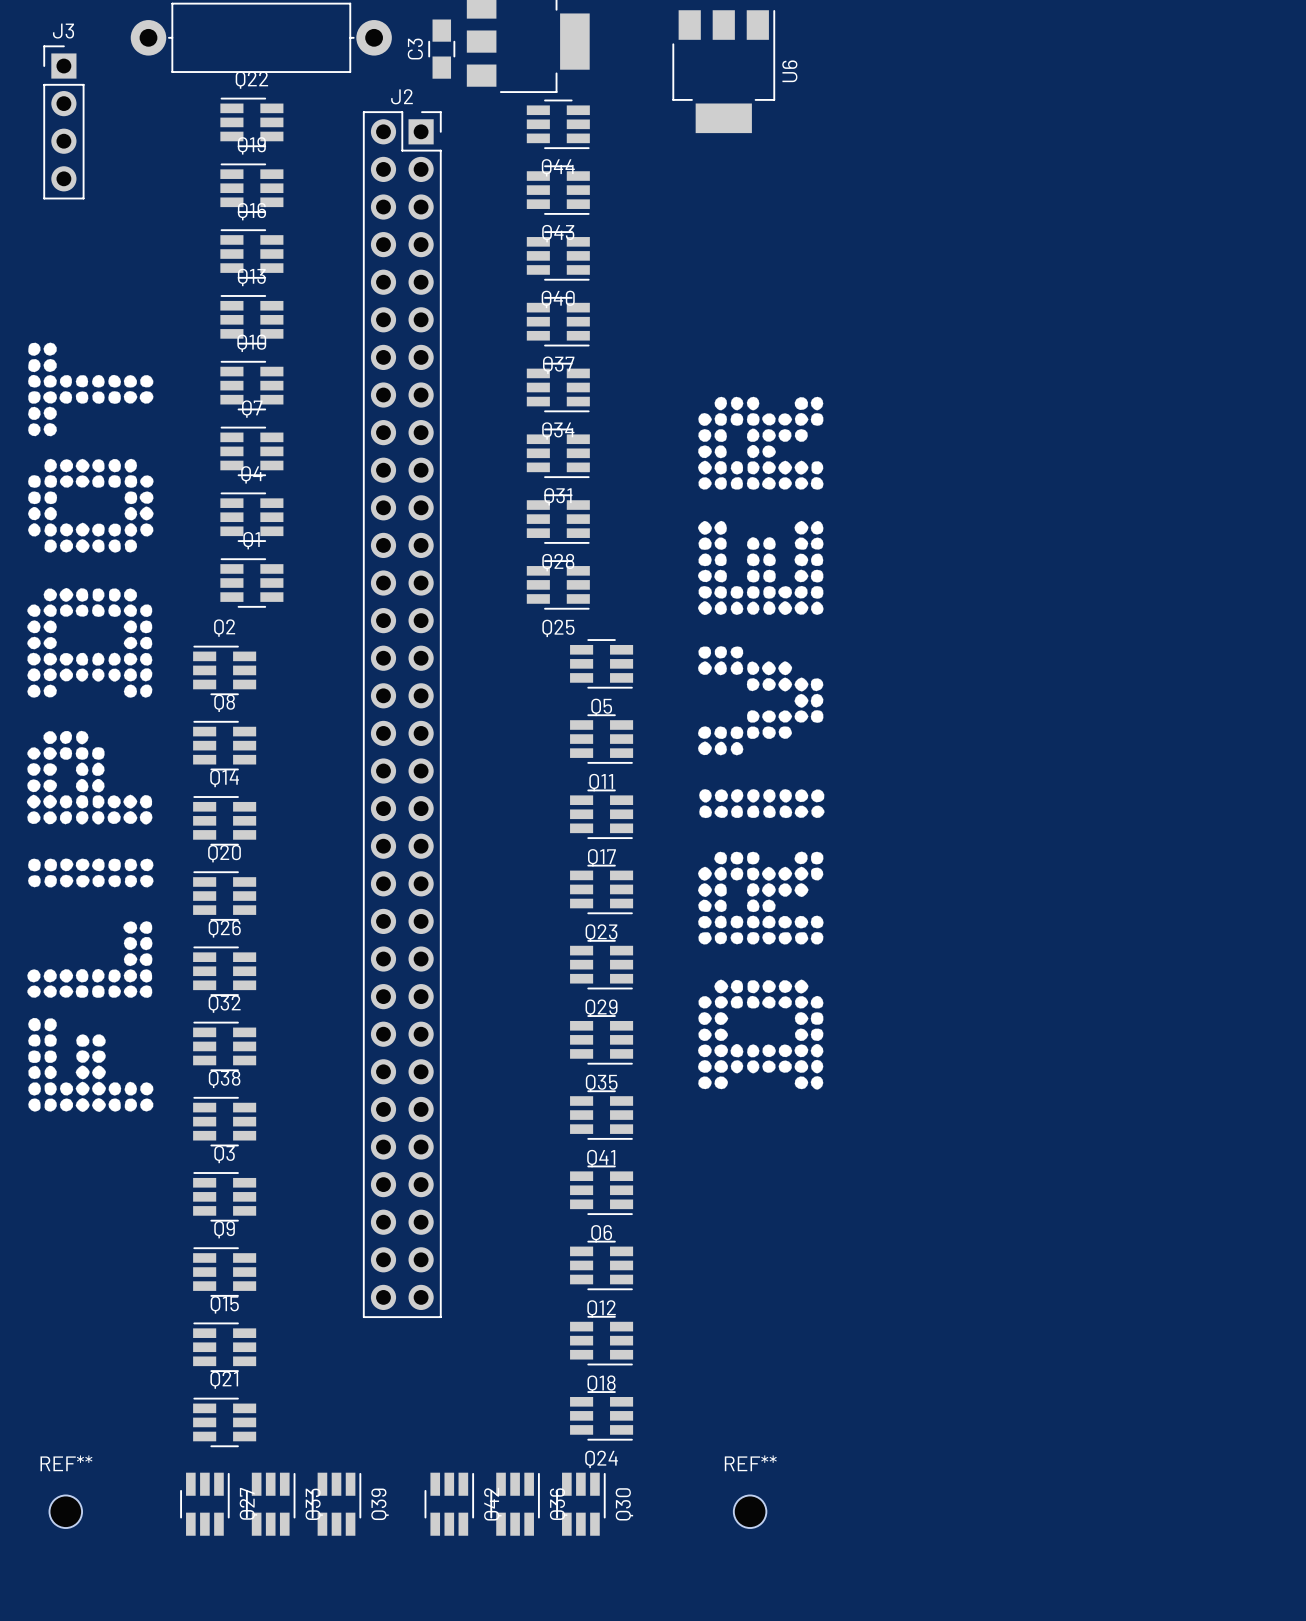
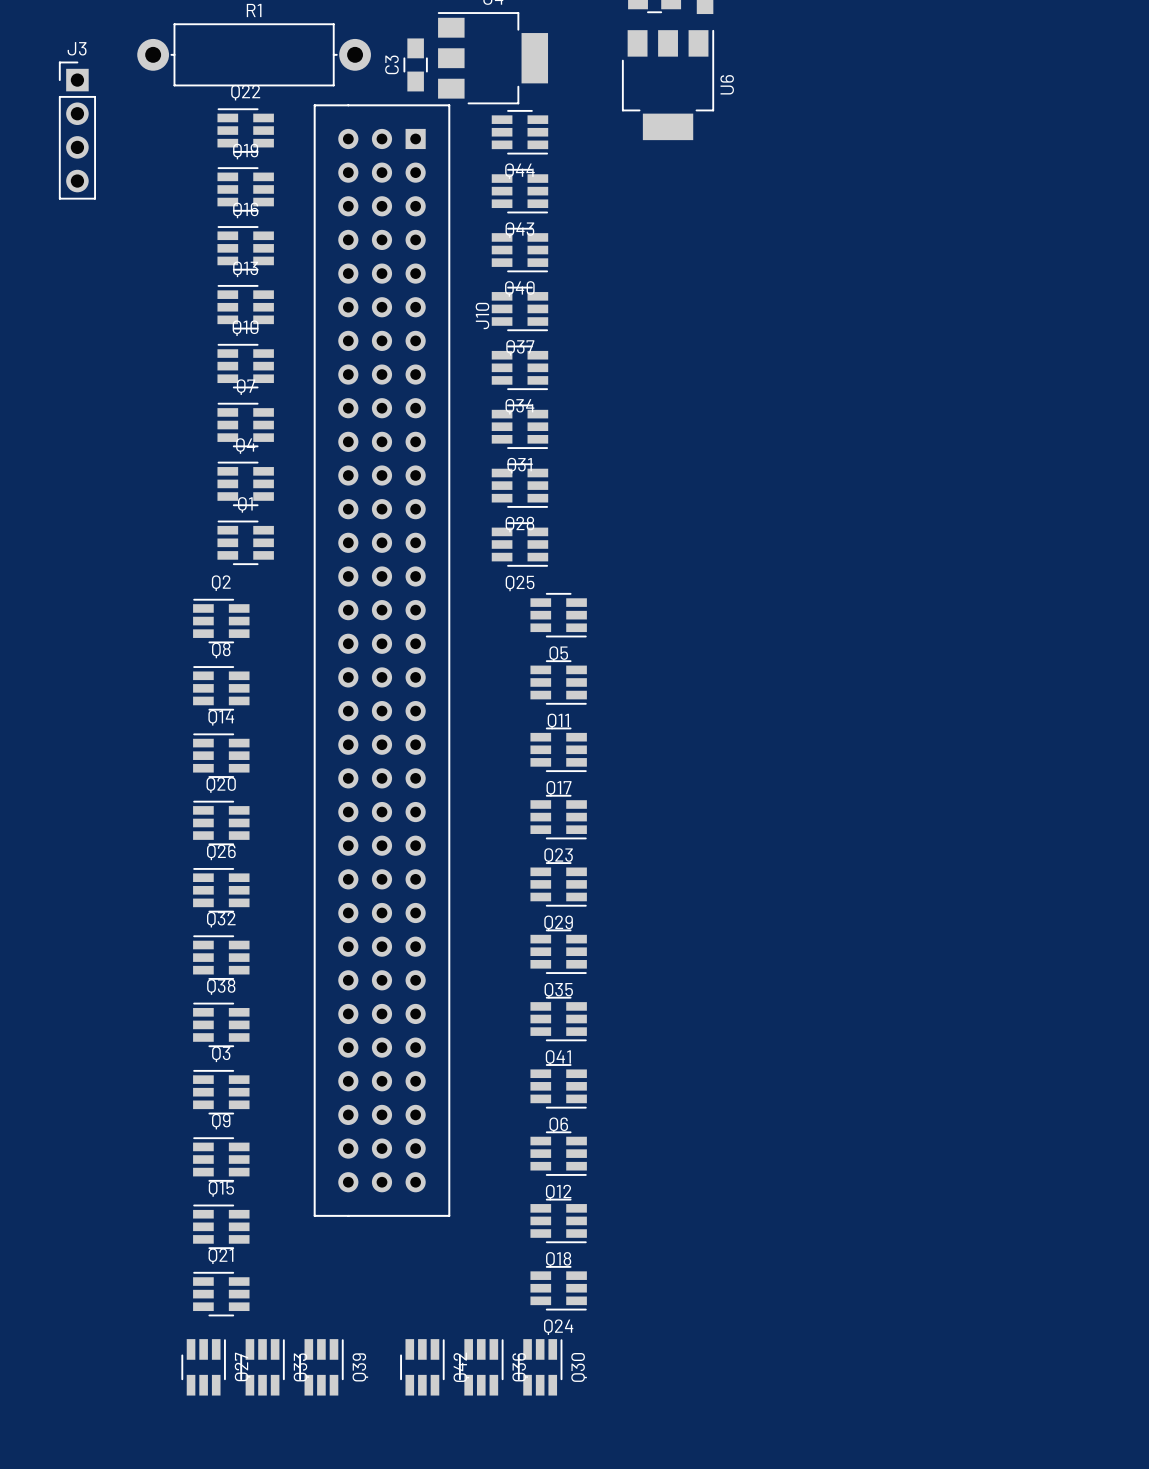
drawing: [26, 342, 154, 1113] -> none
drawing: [698, 396, 825, 1090] -> none
J2: (402, 714) -> none
J10: none -> (381, 660)
REF**: (65, 1511) -> none
REF**: (750, 1511) -> none

